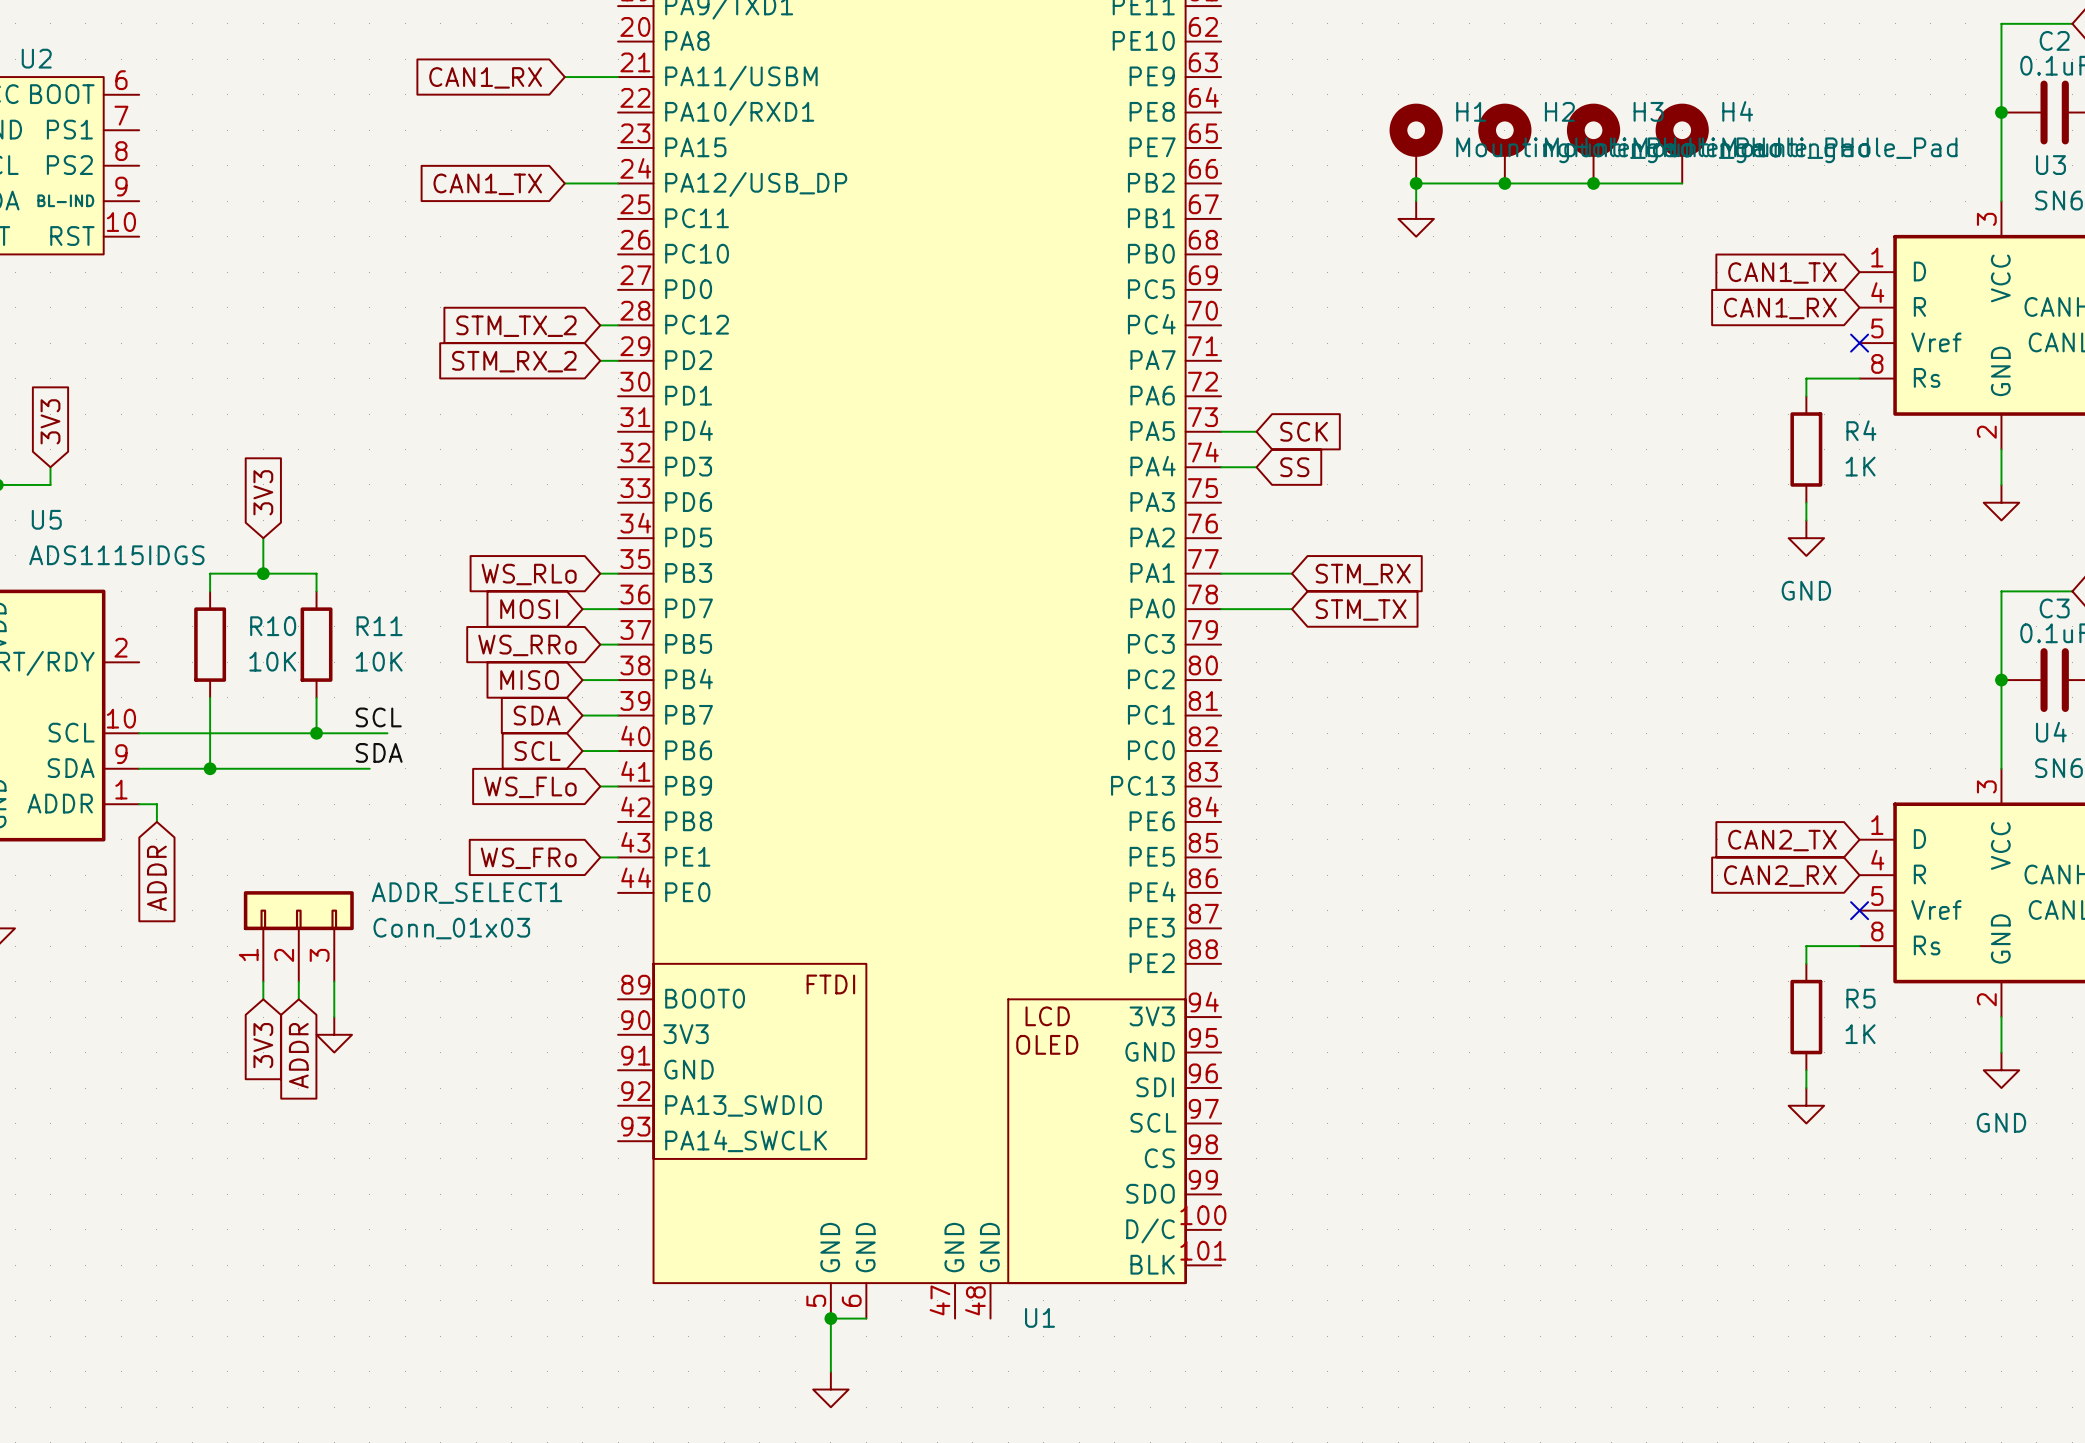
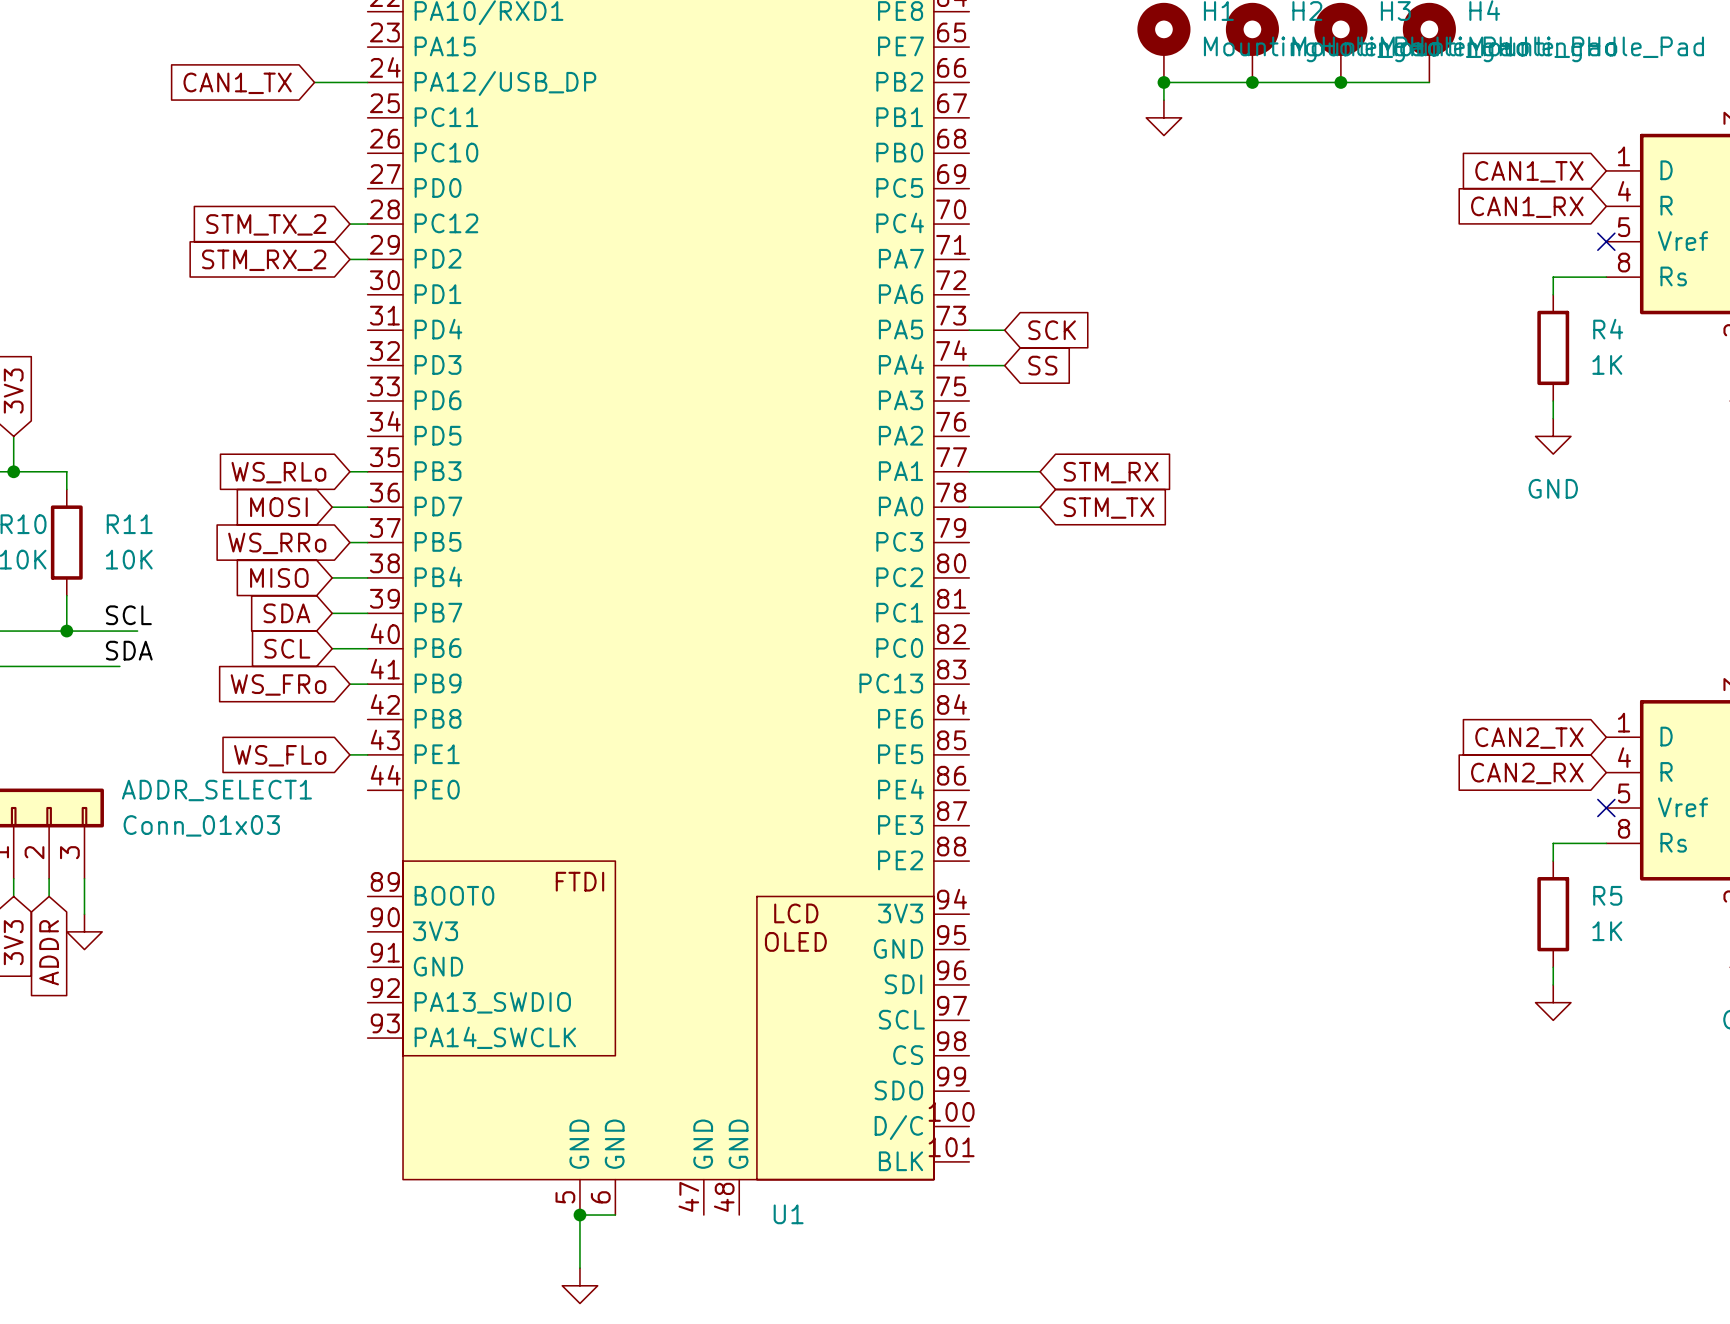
global label: WS_FLo (530, 787) -> WS_FRo (278, 684)
global label: WS_FRo (528, 858) -> WS_FLo (280, 755)

